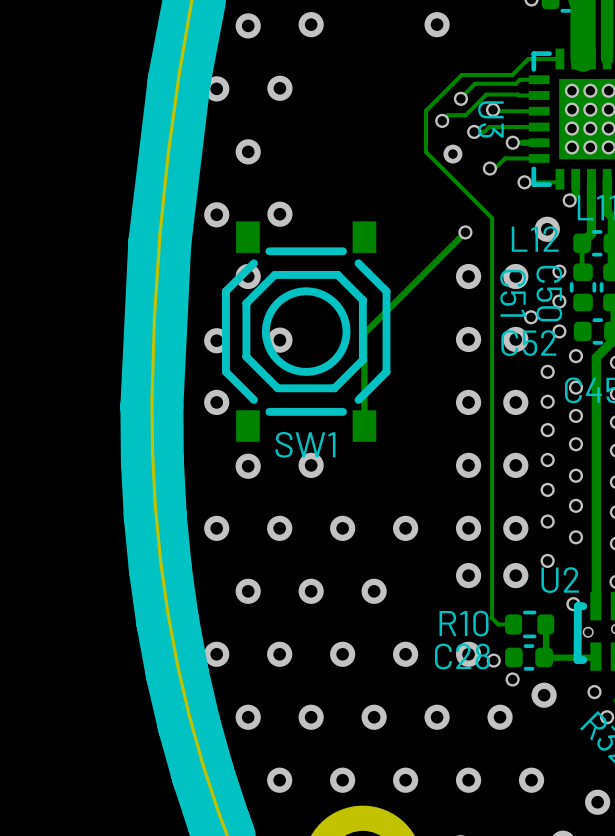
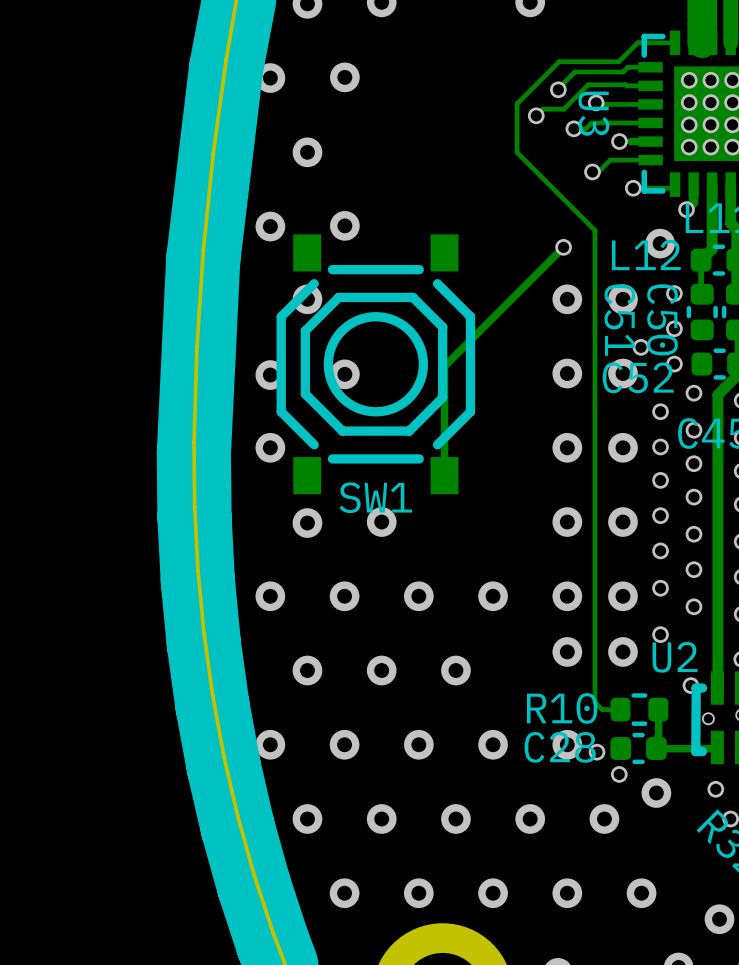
via: (452, 154) -> none

